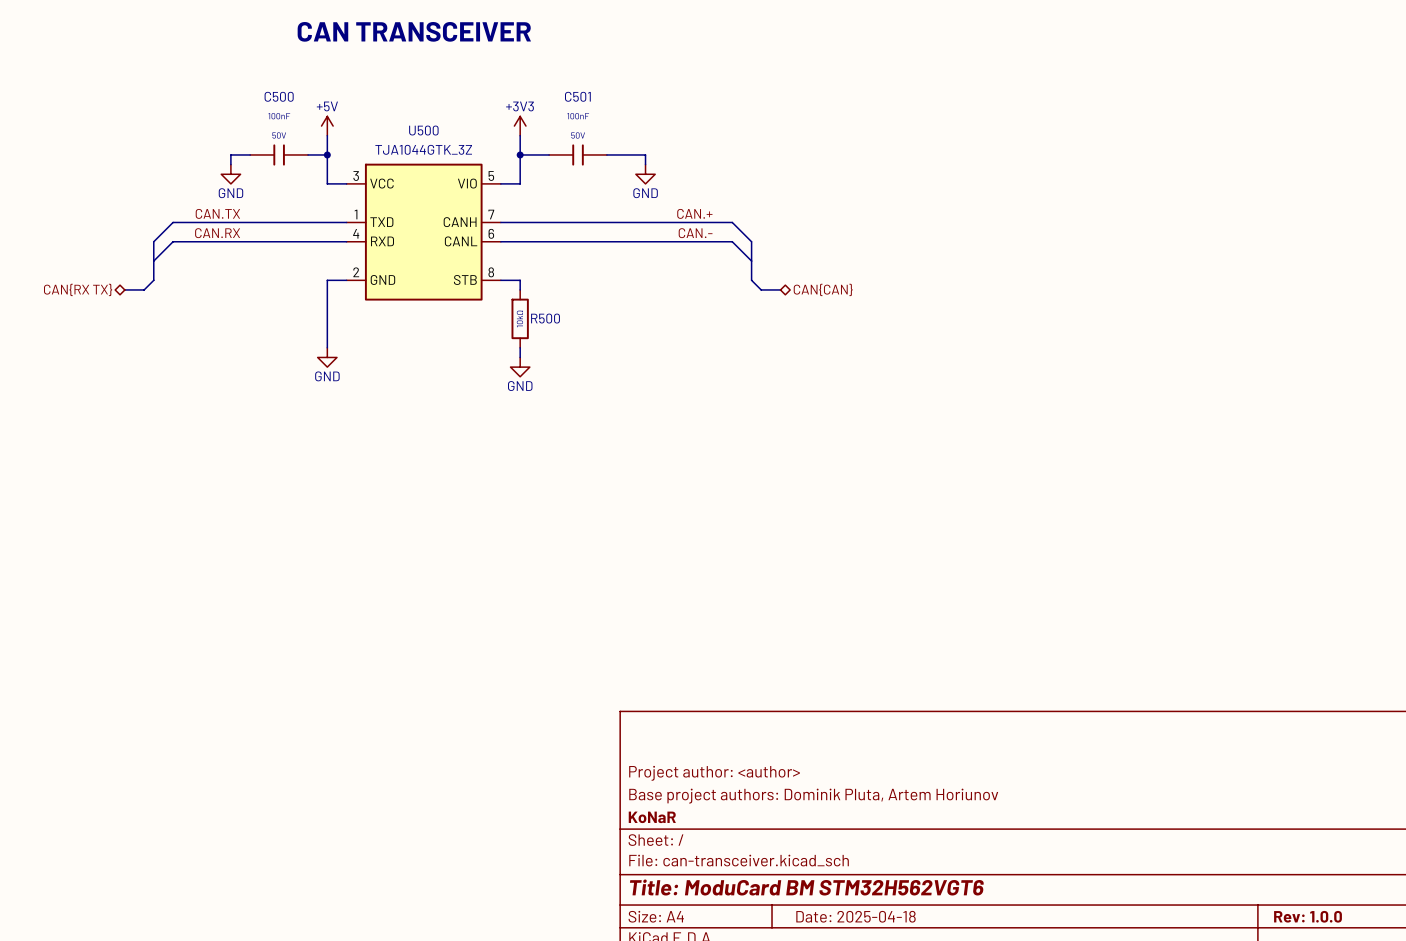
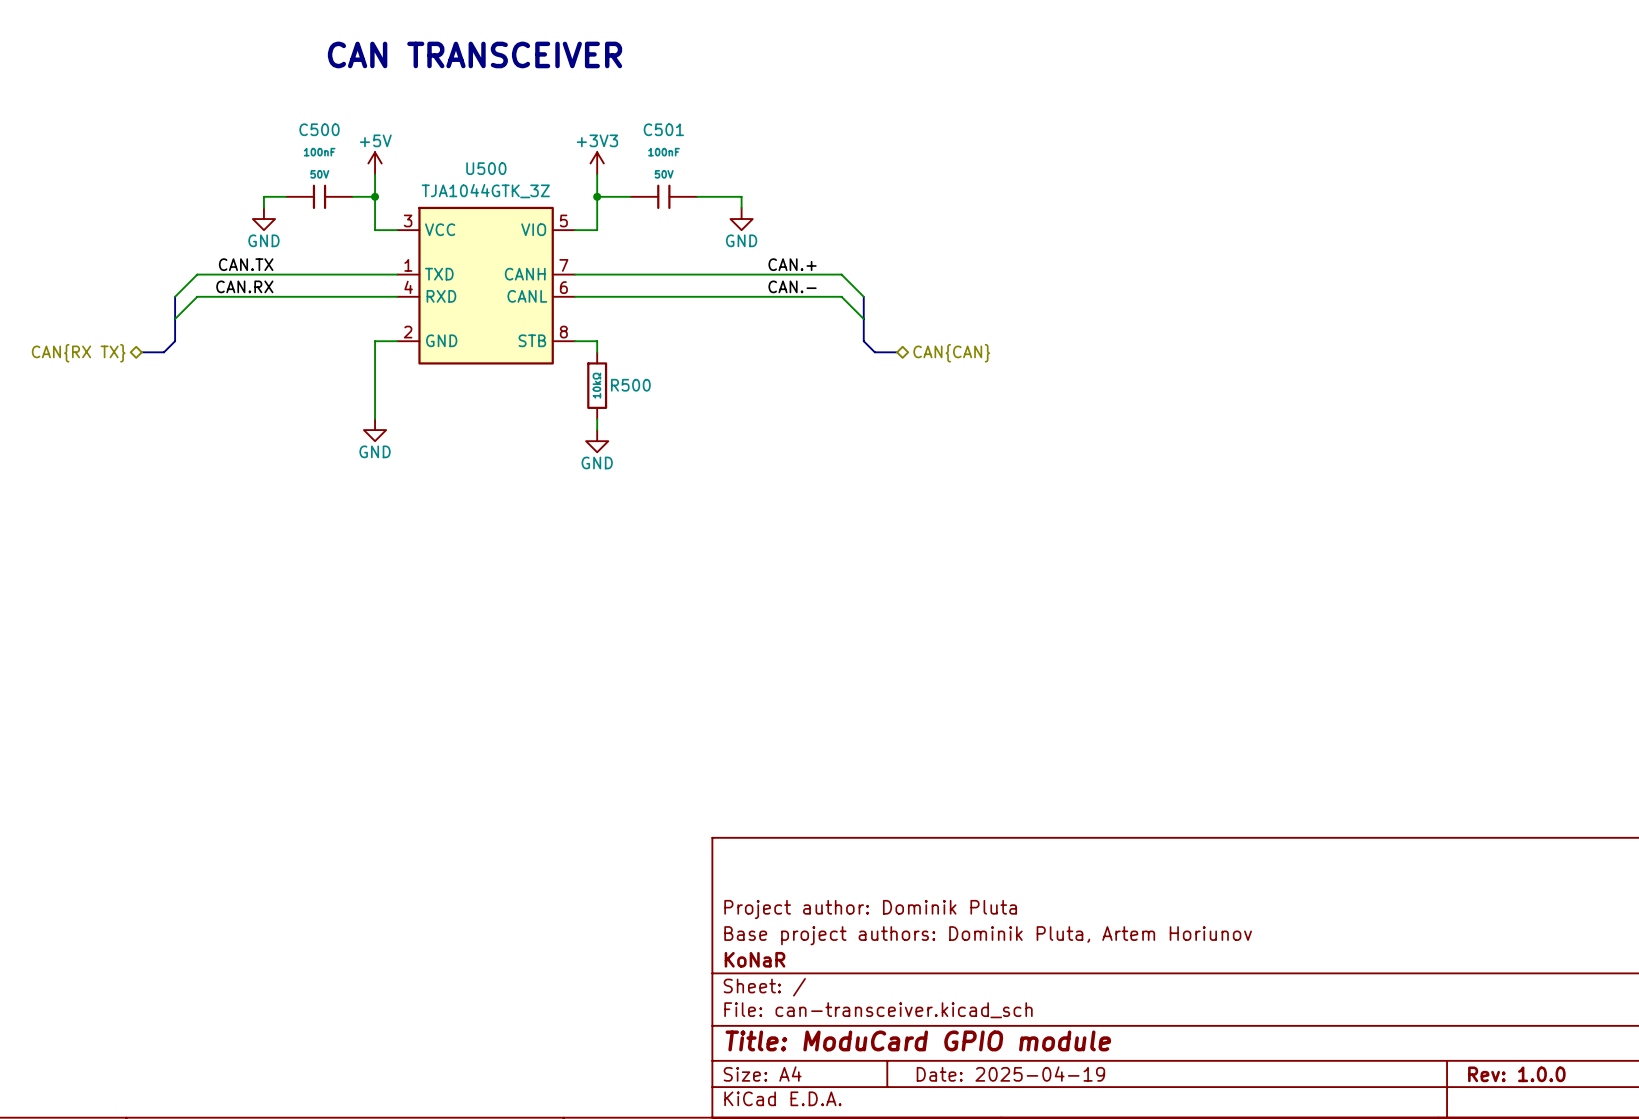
title block: Project author: <author> (714, 773) -> Project author: Dominik Pluta (870, 909)
title block: Title: ModuCard BM STM32H562VGT6 (806, 887) -> Title: ModuCard GPIO module (918, 1040)
title block: Date: 2025-04-18 (855, 916) -> Date: 2025-04-19 (1010, 1074)

